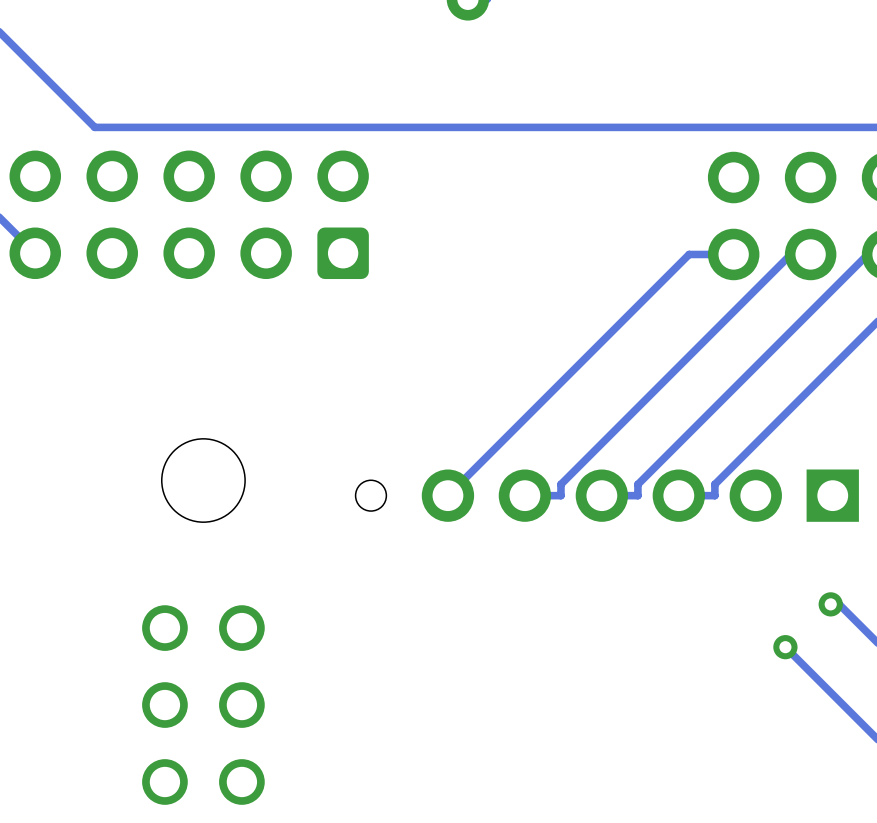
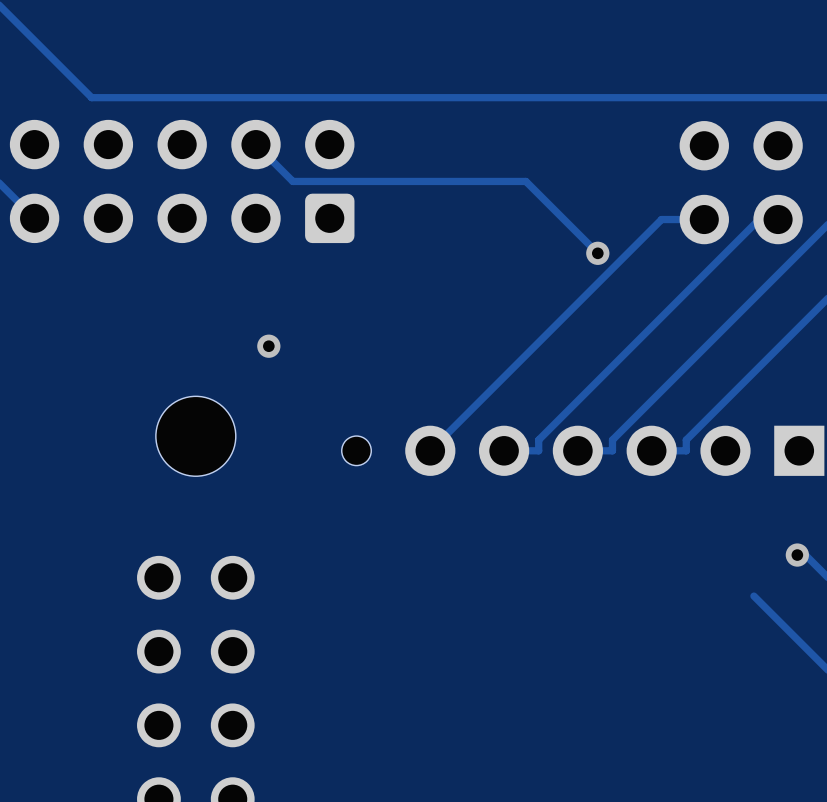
track: none -> (255, 144) (292, 181) (525, 181) (597, 253)
via: none -> (597, 253)
via: none -> (268, 346)
via: (785, 647) -> none

